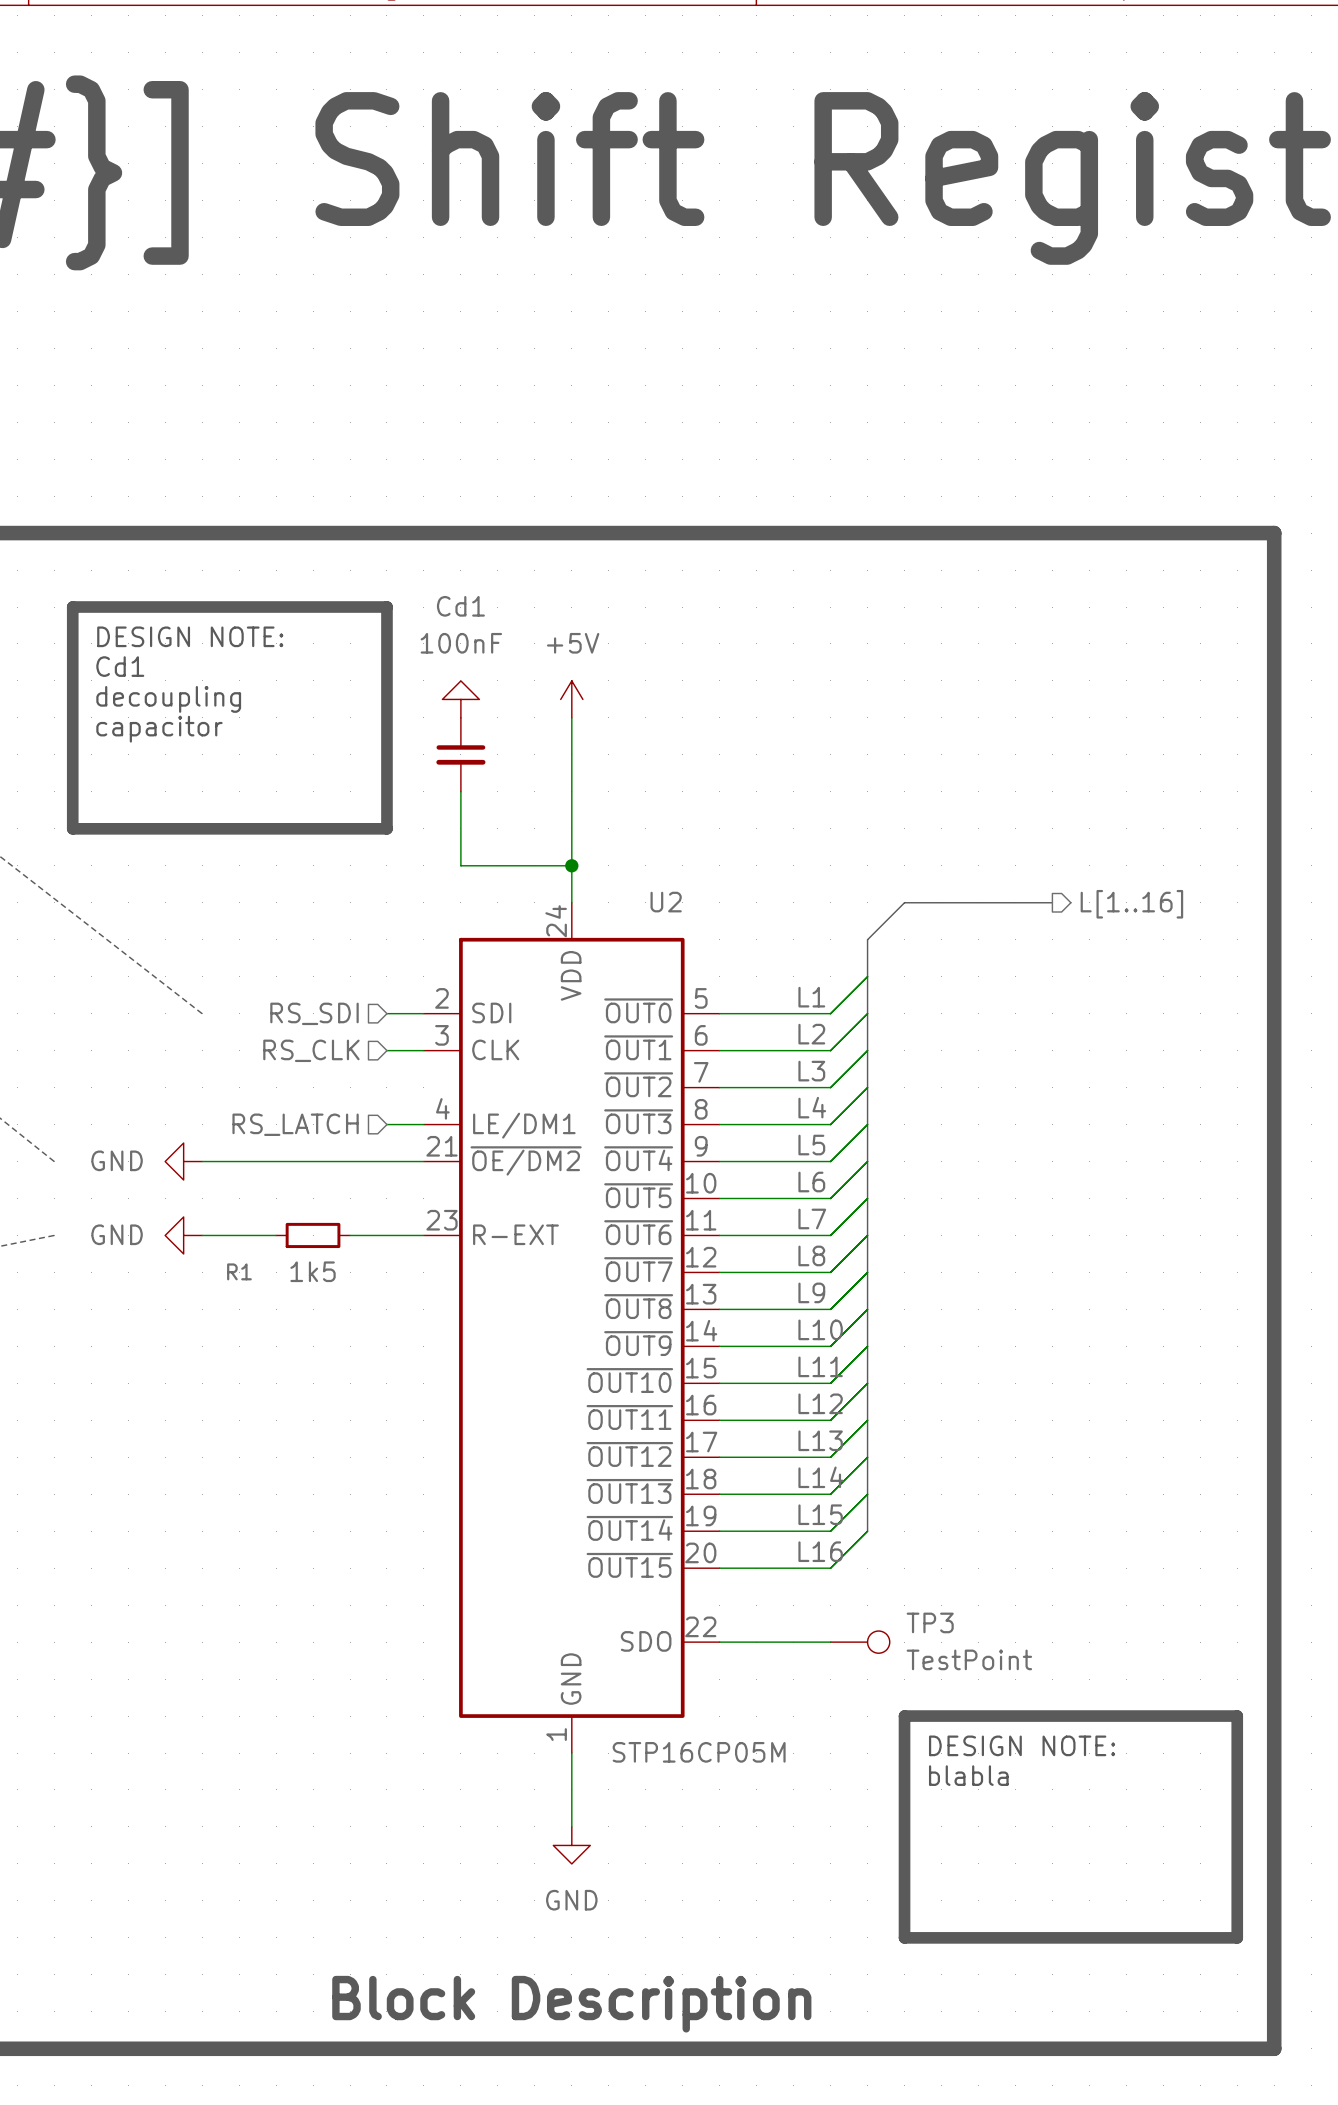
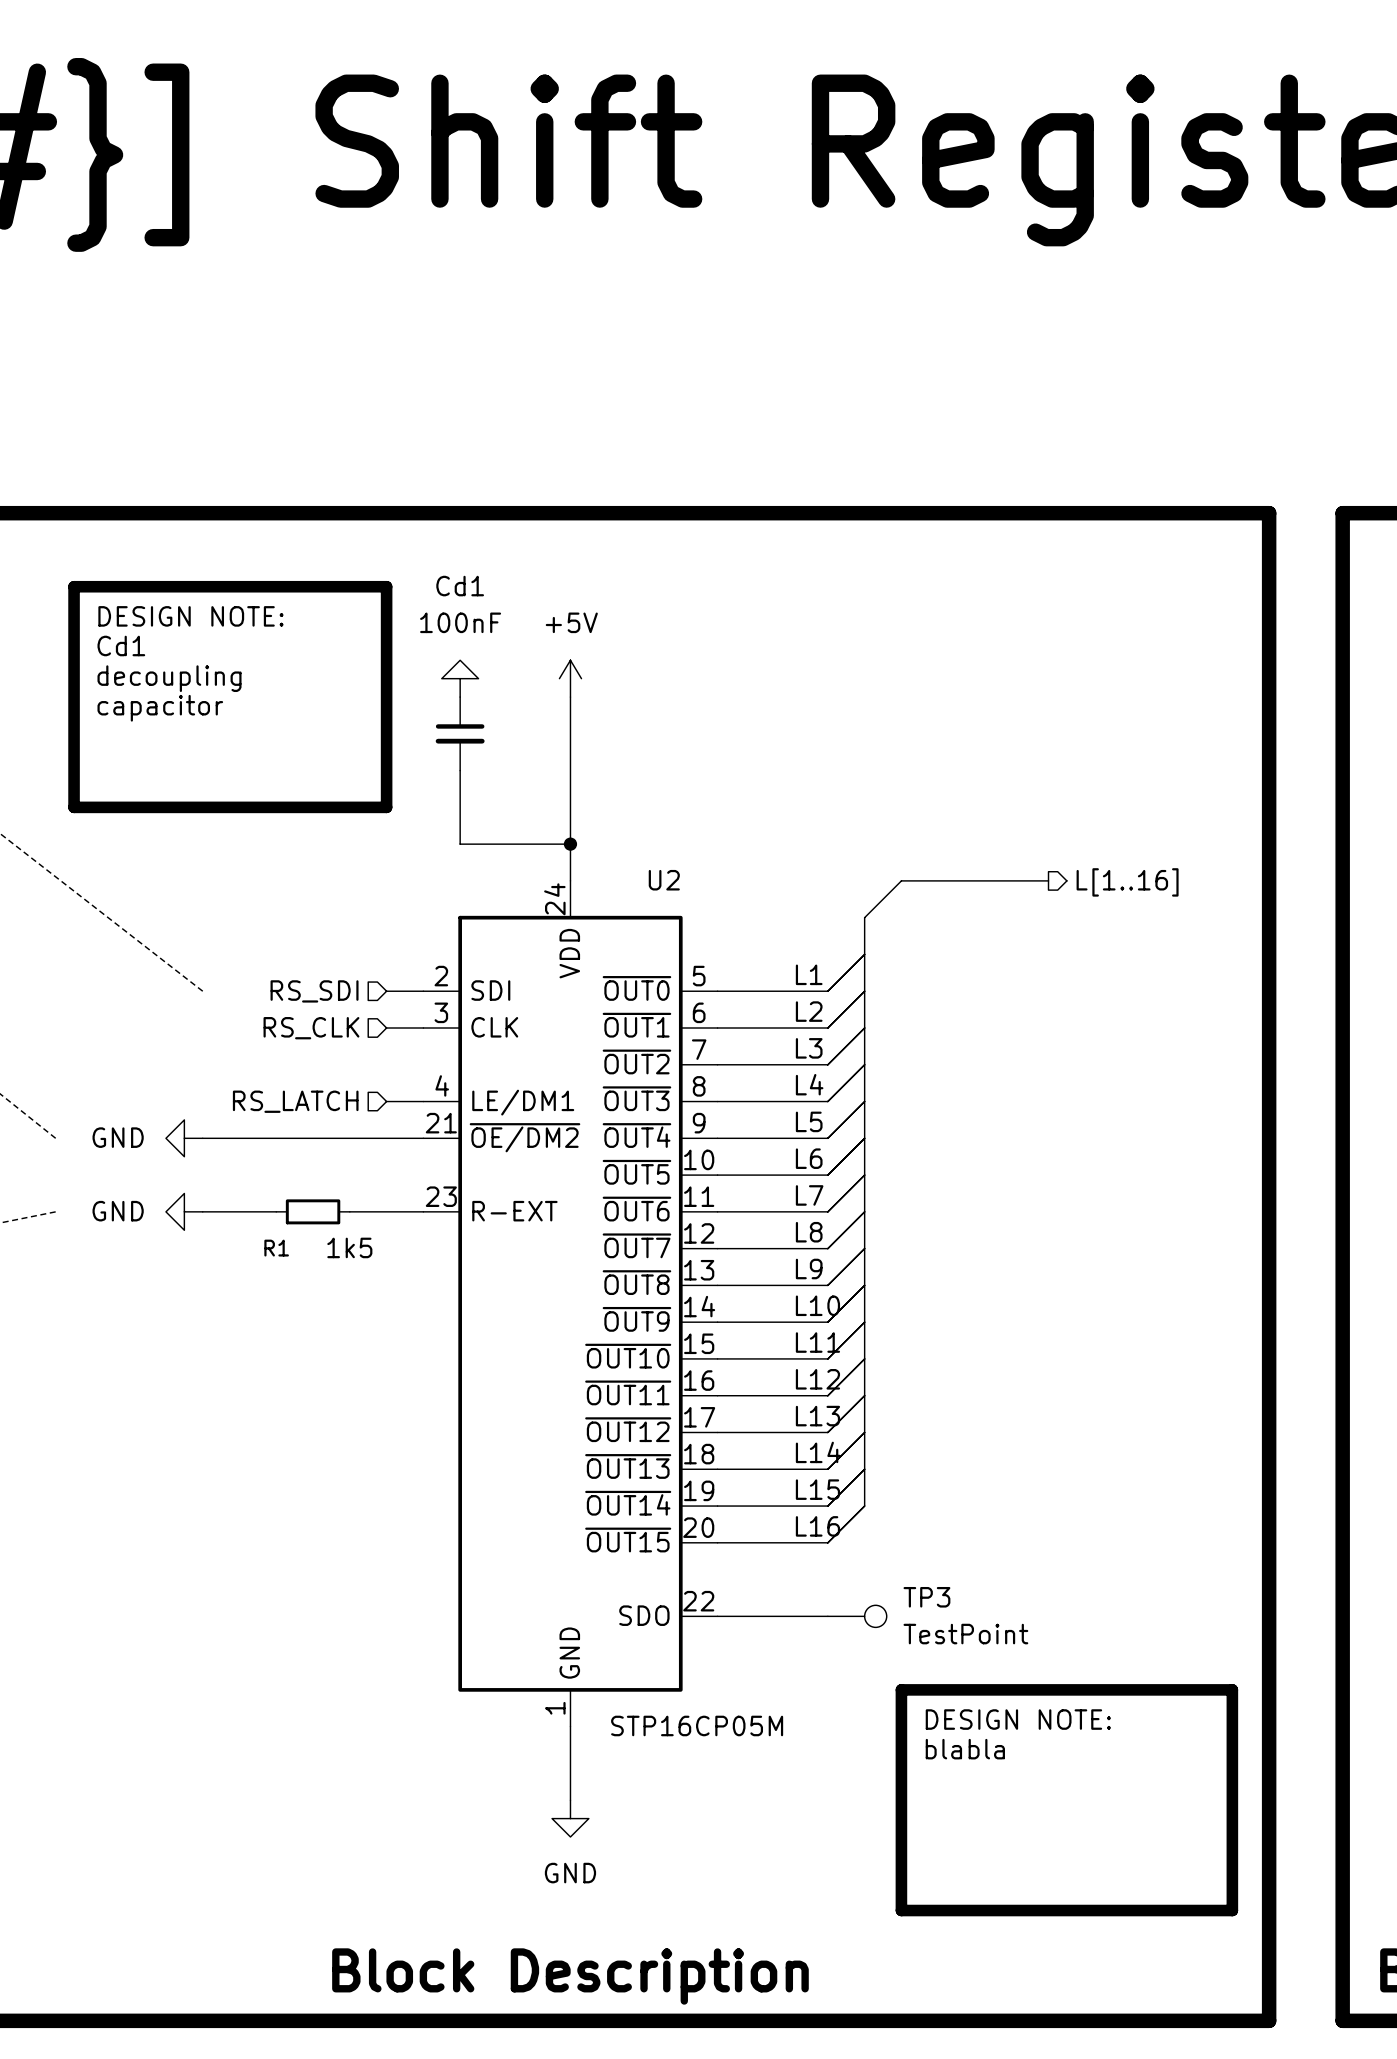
R1 name position: R1 (239, 1271) -> R1 (276, 1248)
R1 value position: 1k5 (313, 1271) -> 1k5 (349, 1247)

